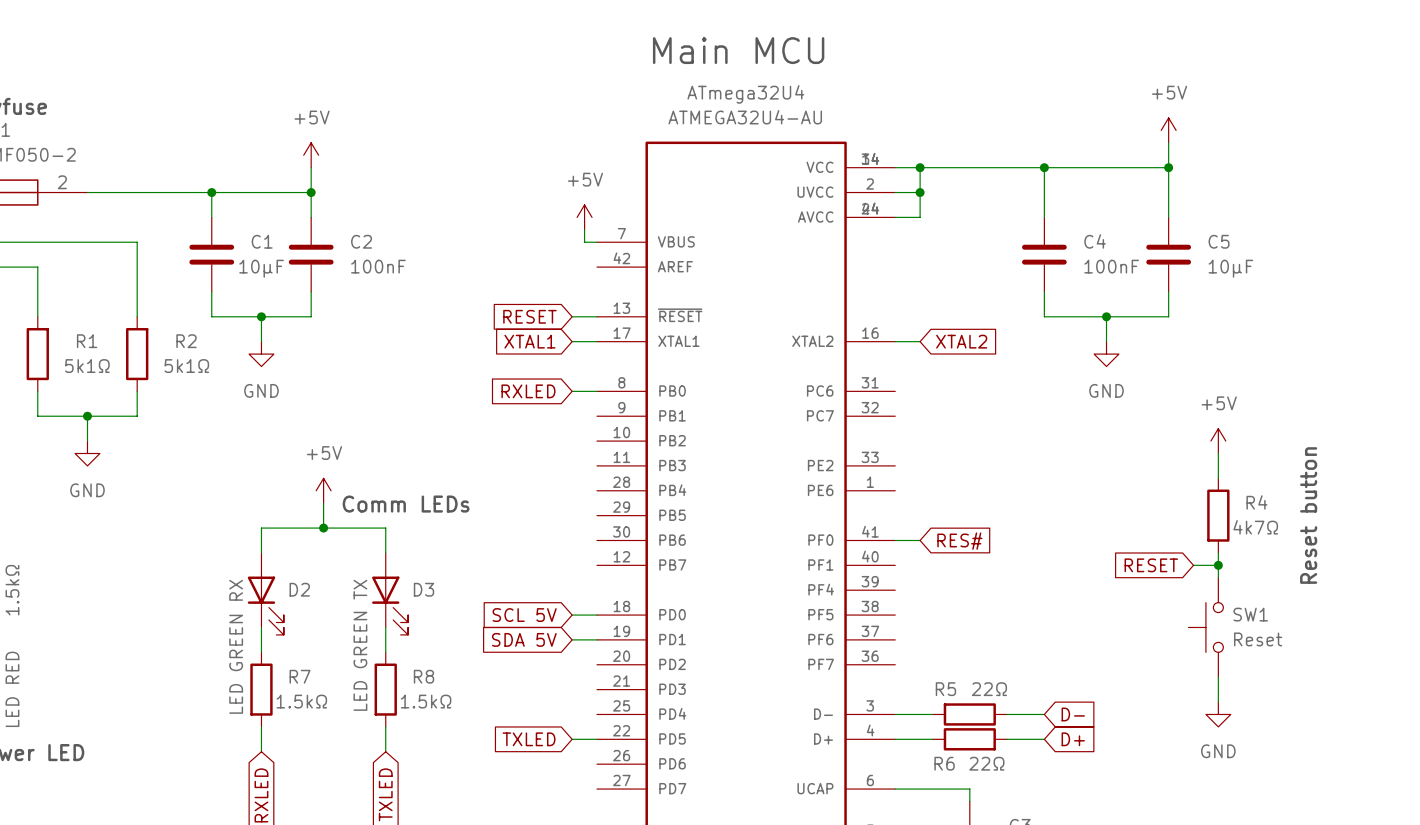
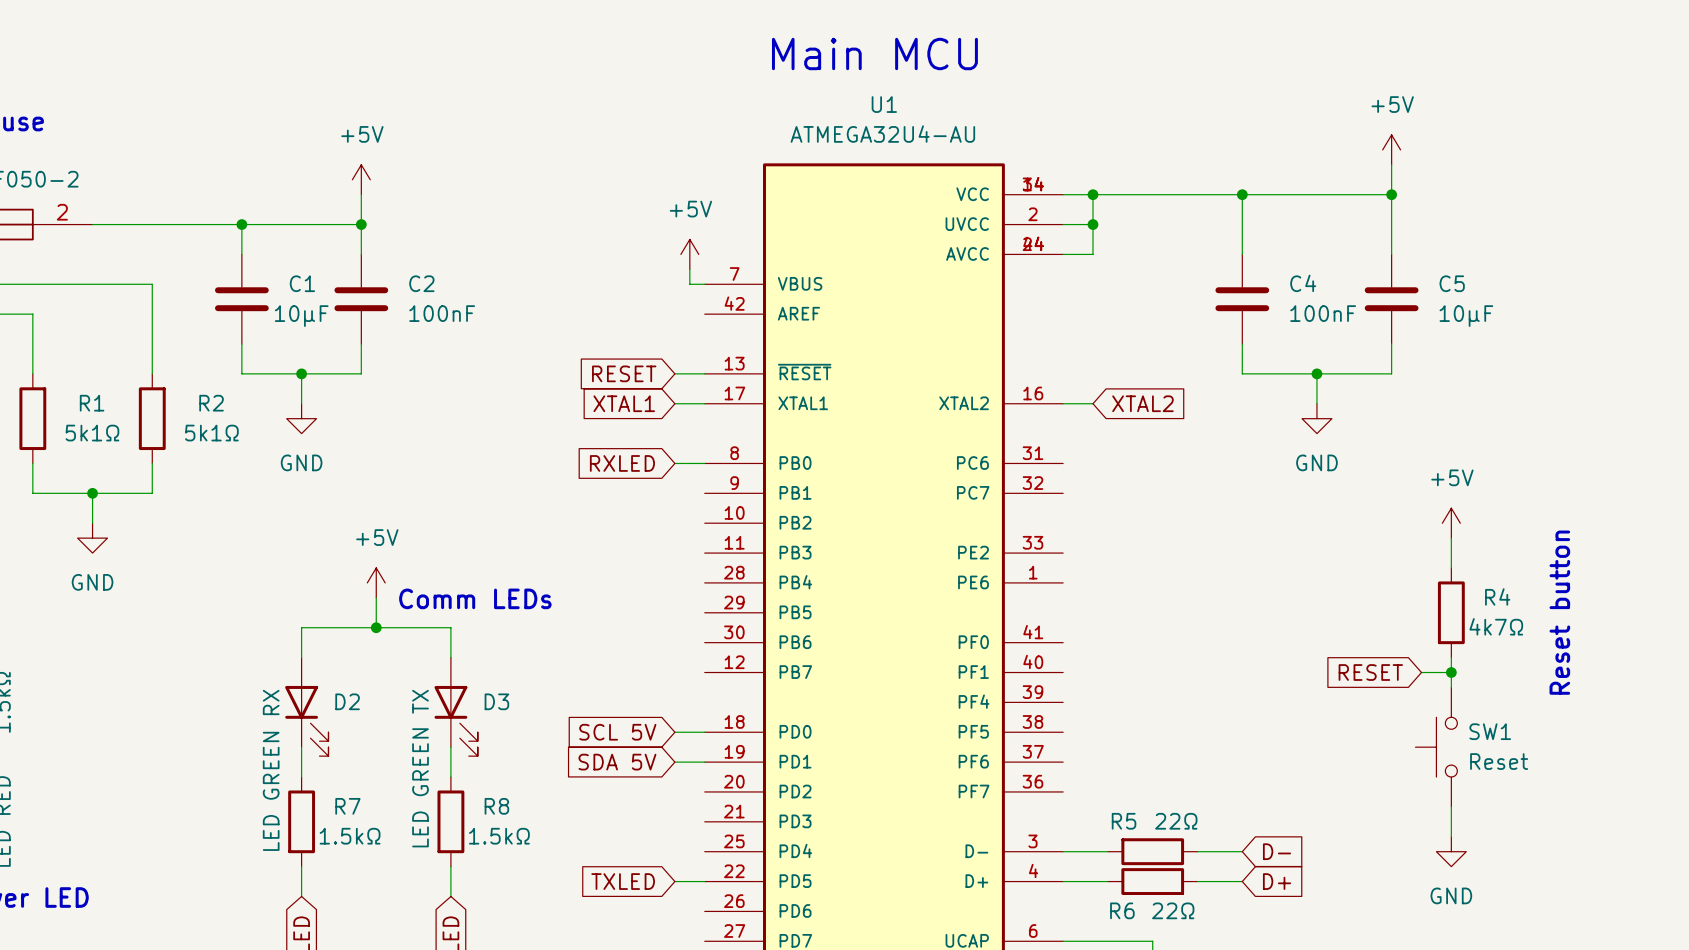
ATmega32U4 name: ATmega32U4 (745, 94) -> U1 (884, 104)
wire: (895, 540) (920, 540) -> none
global label: RES# (959, 541) -> none

